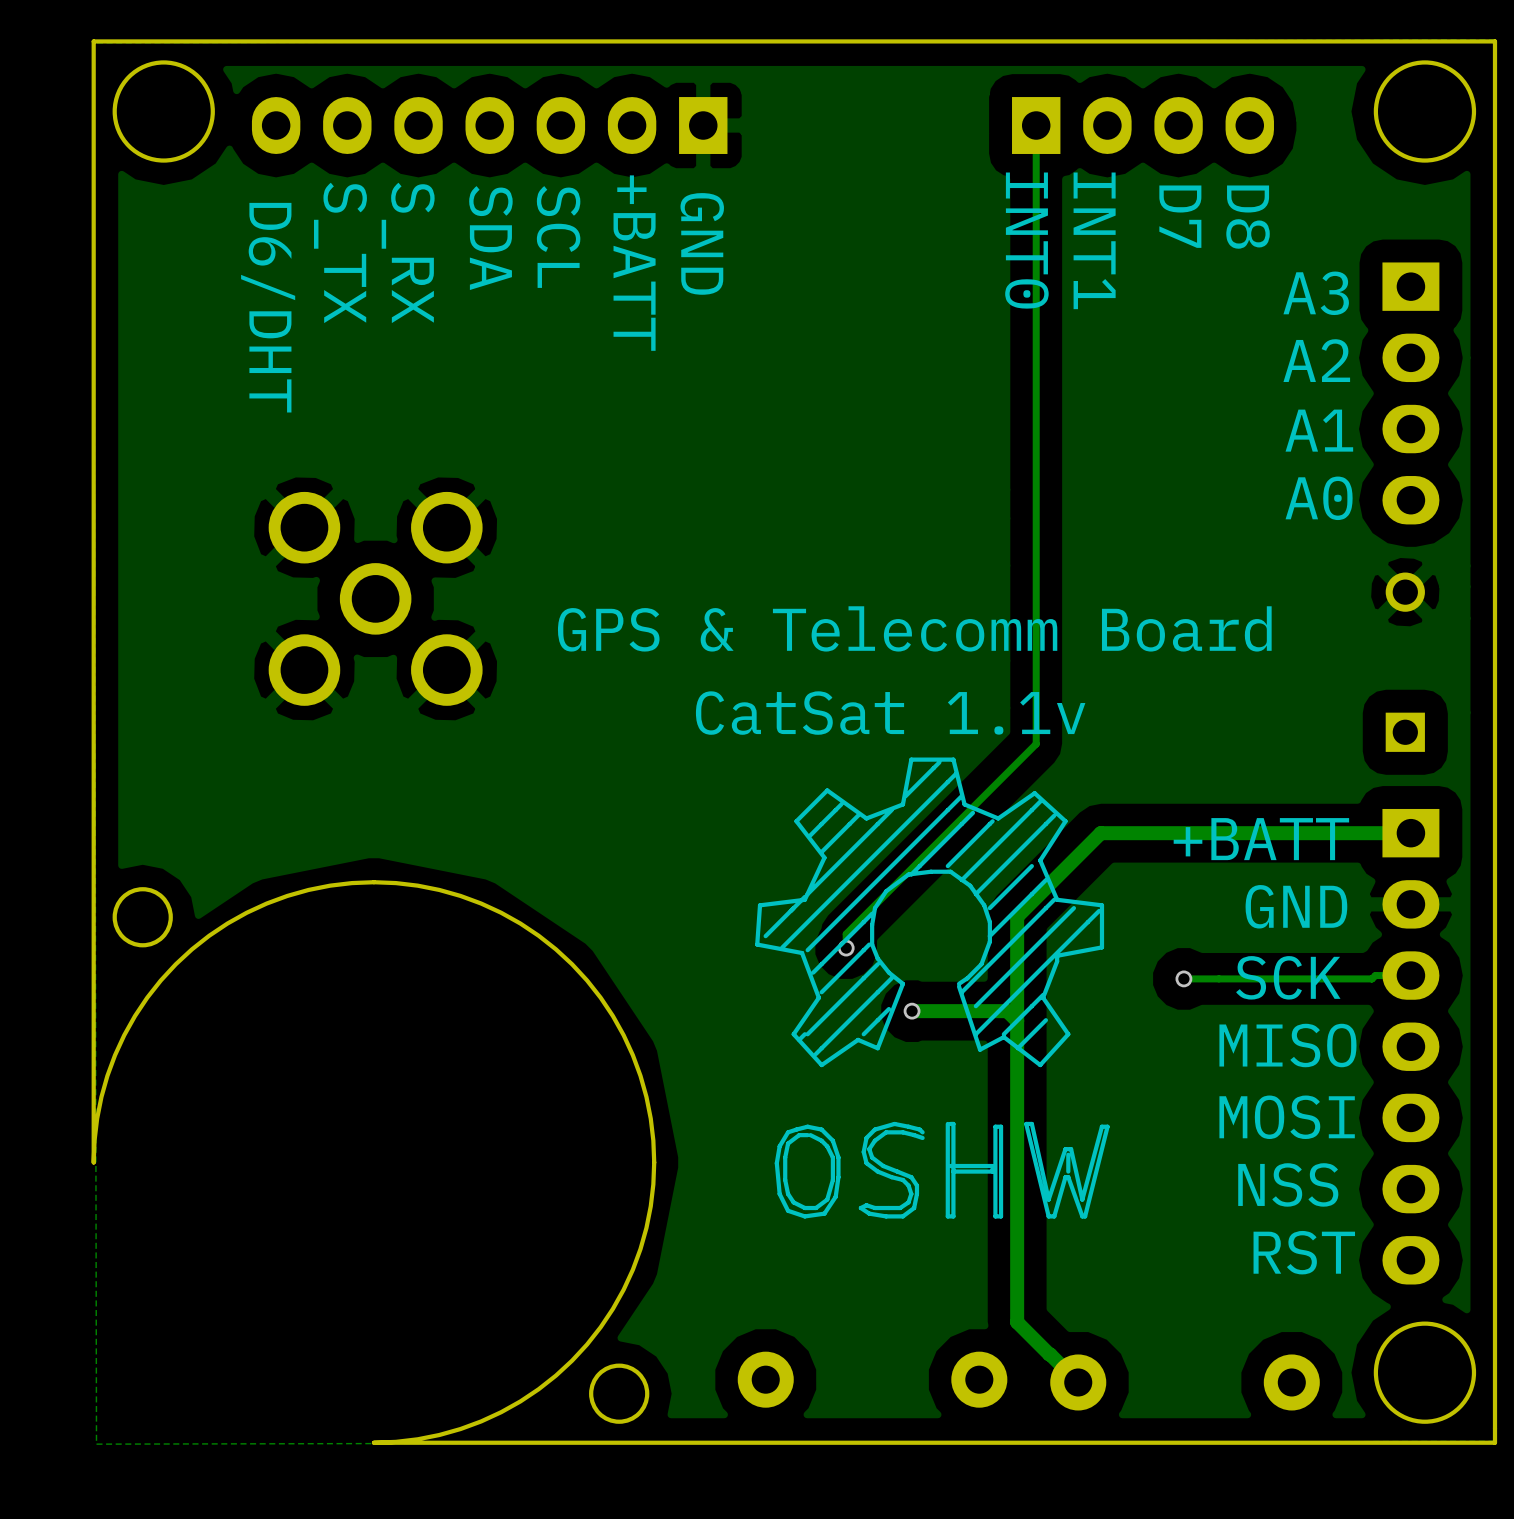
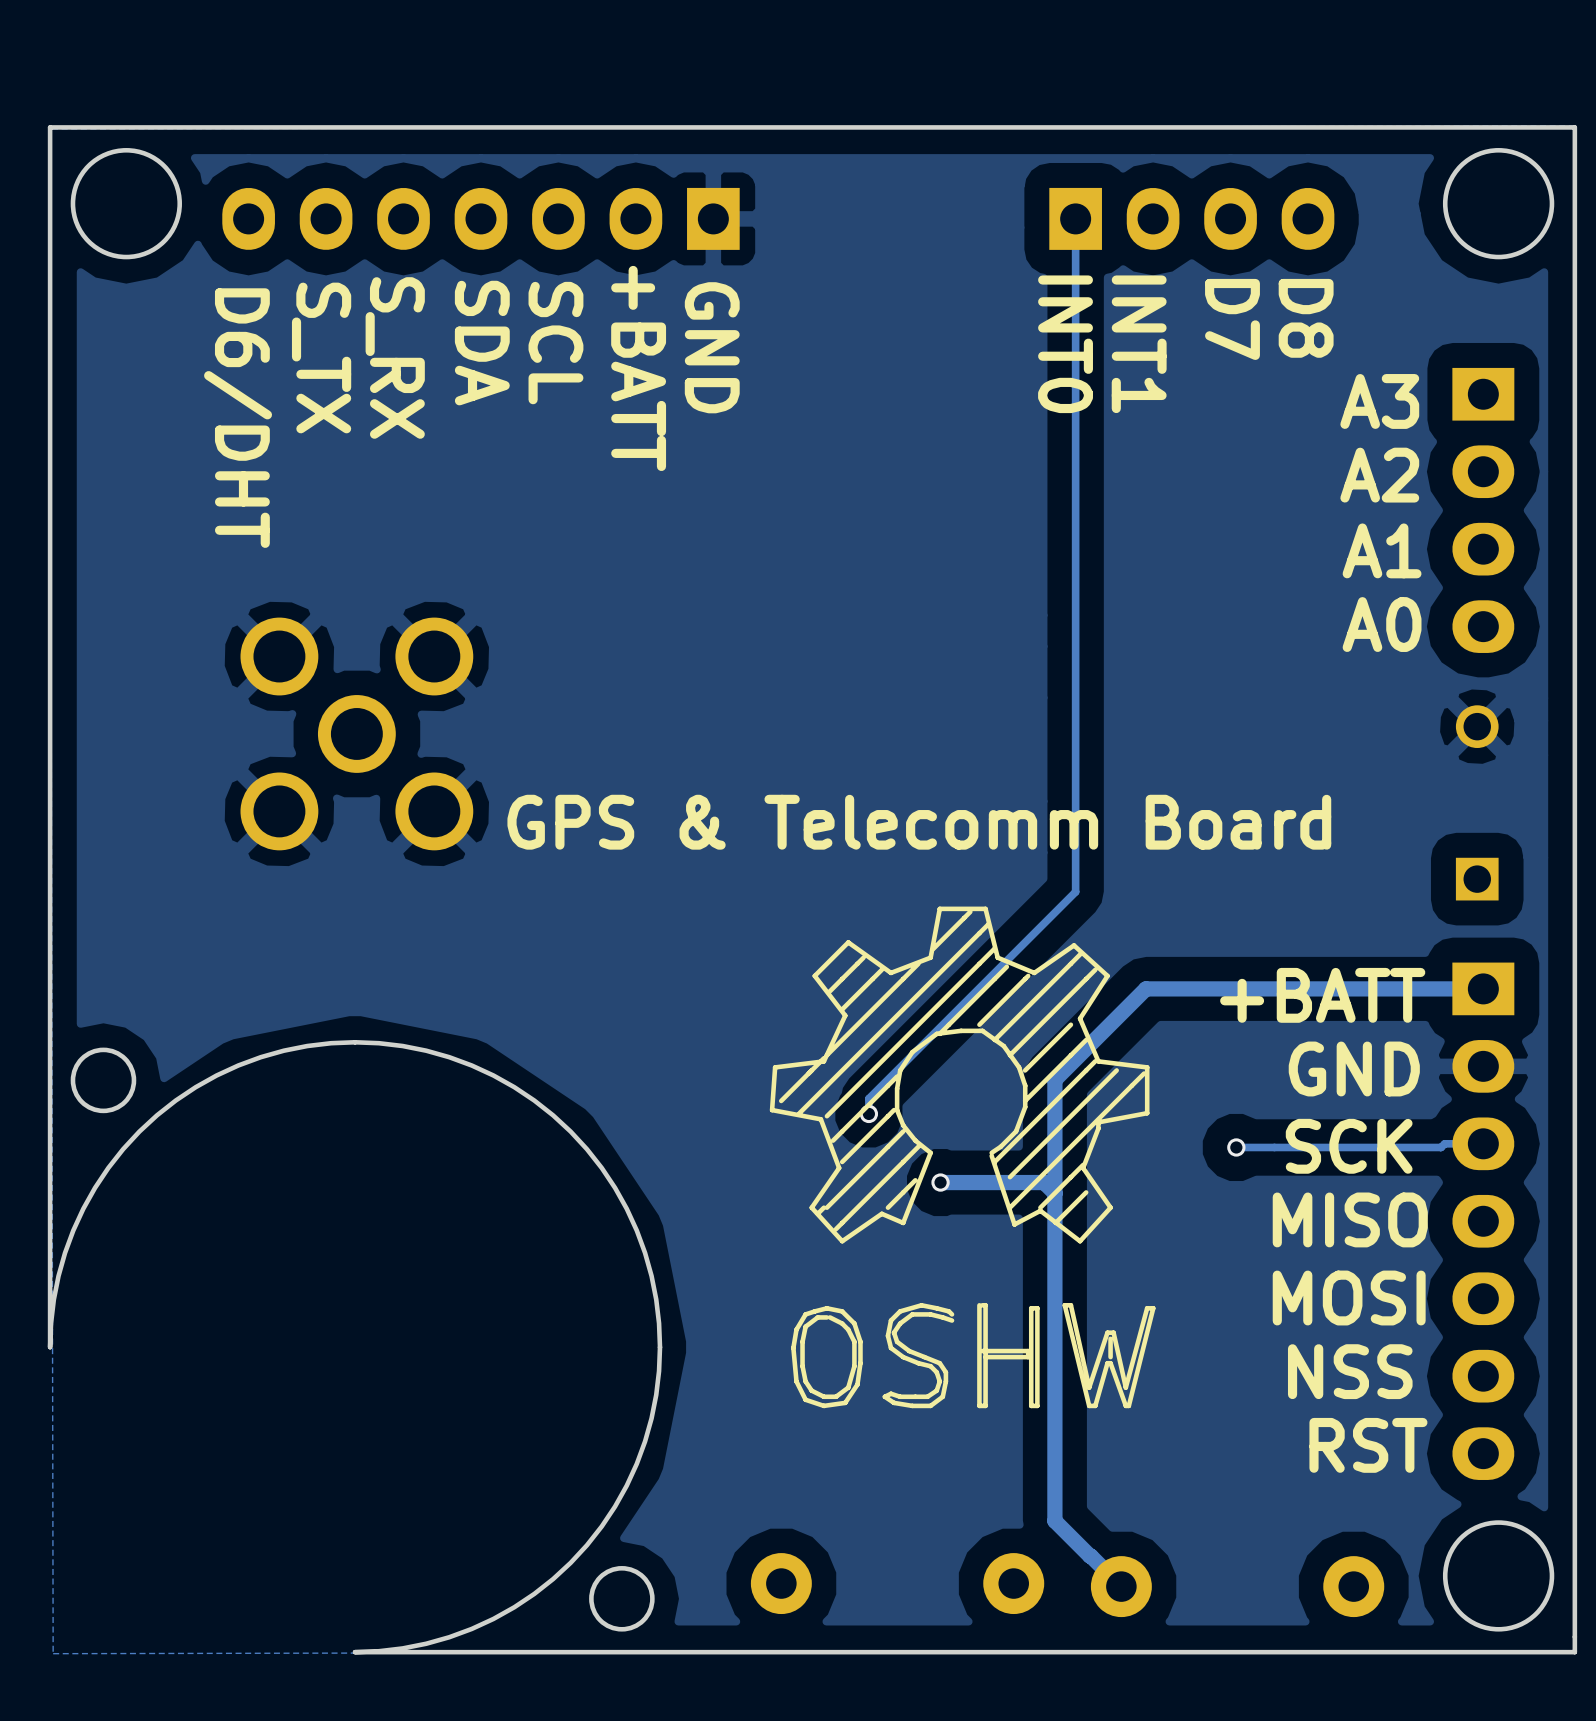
text position: GPS & Telecomm Board (914, 628) -> GPS & Telecomm Board (919, 822)
text: CatSat 1.1v (890, 713) -> none

